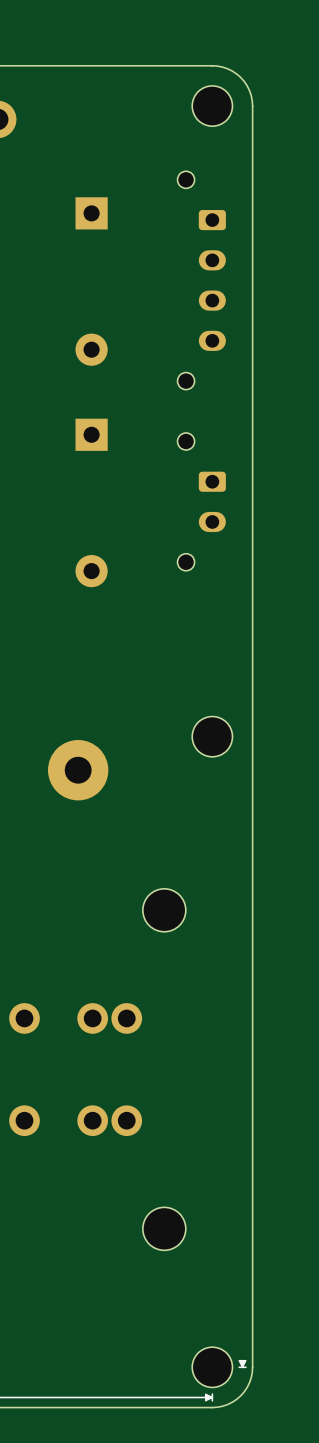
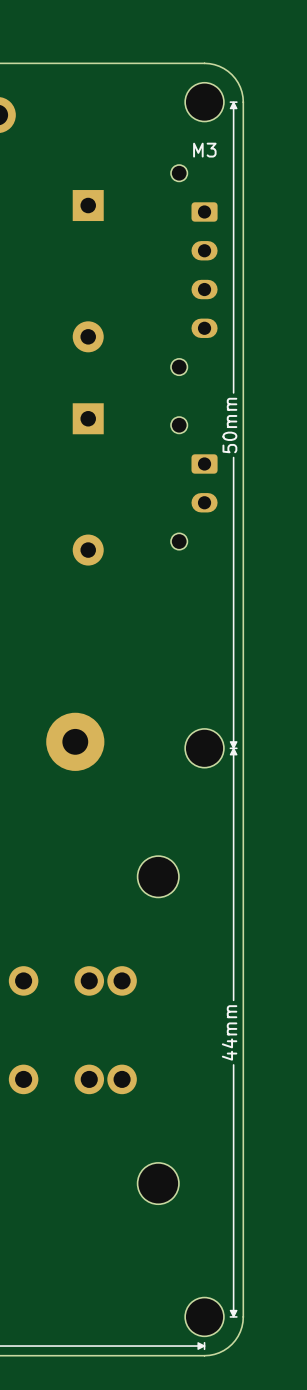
drawing: none -> [229, 101, 238, 110]
line: none -> (236, 102) (230, 102)
line: none -> (233, 108) (233, 392)
text: none -> M3 (204, 150)
text: none -> 50mm (229, 425)
line: none -> (233, 457) (233, 741)
part position: (212, 736) -> (204, 748)
drawing: none -> [229, 741, 238, 756]
line: none -> (236, 748) (230, 748)
line: none -> (233, 754) (233, 1000)
text: none -> 44mm (229, 1032)
line: none -> (233, 1064) (233, 1310)

